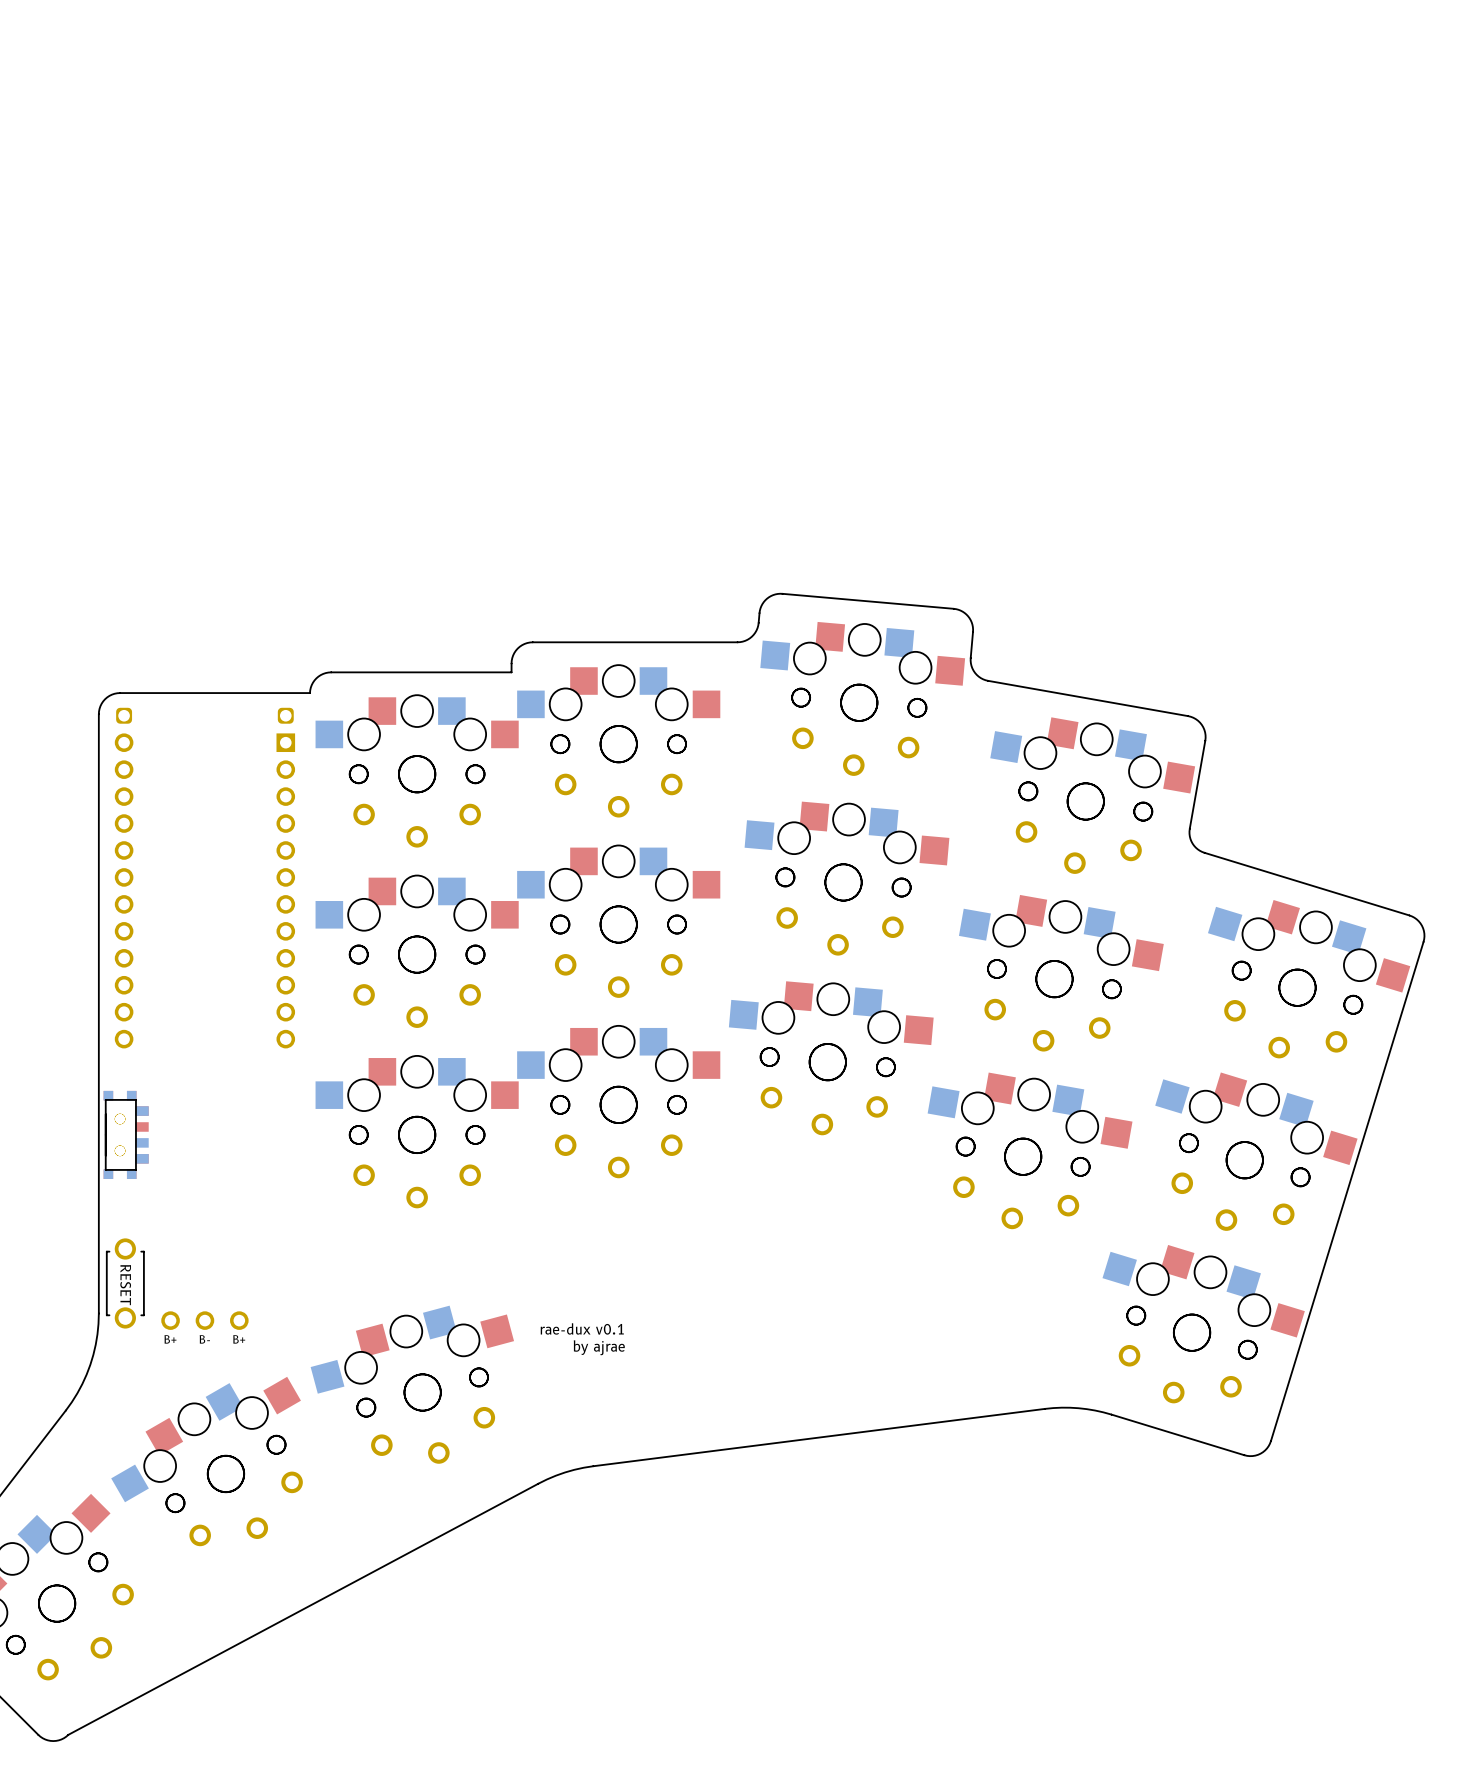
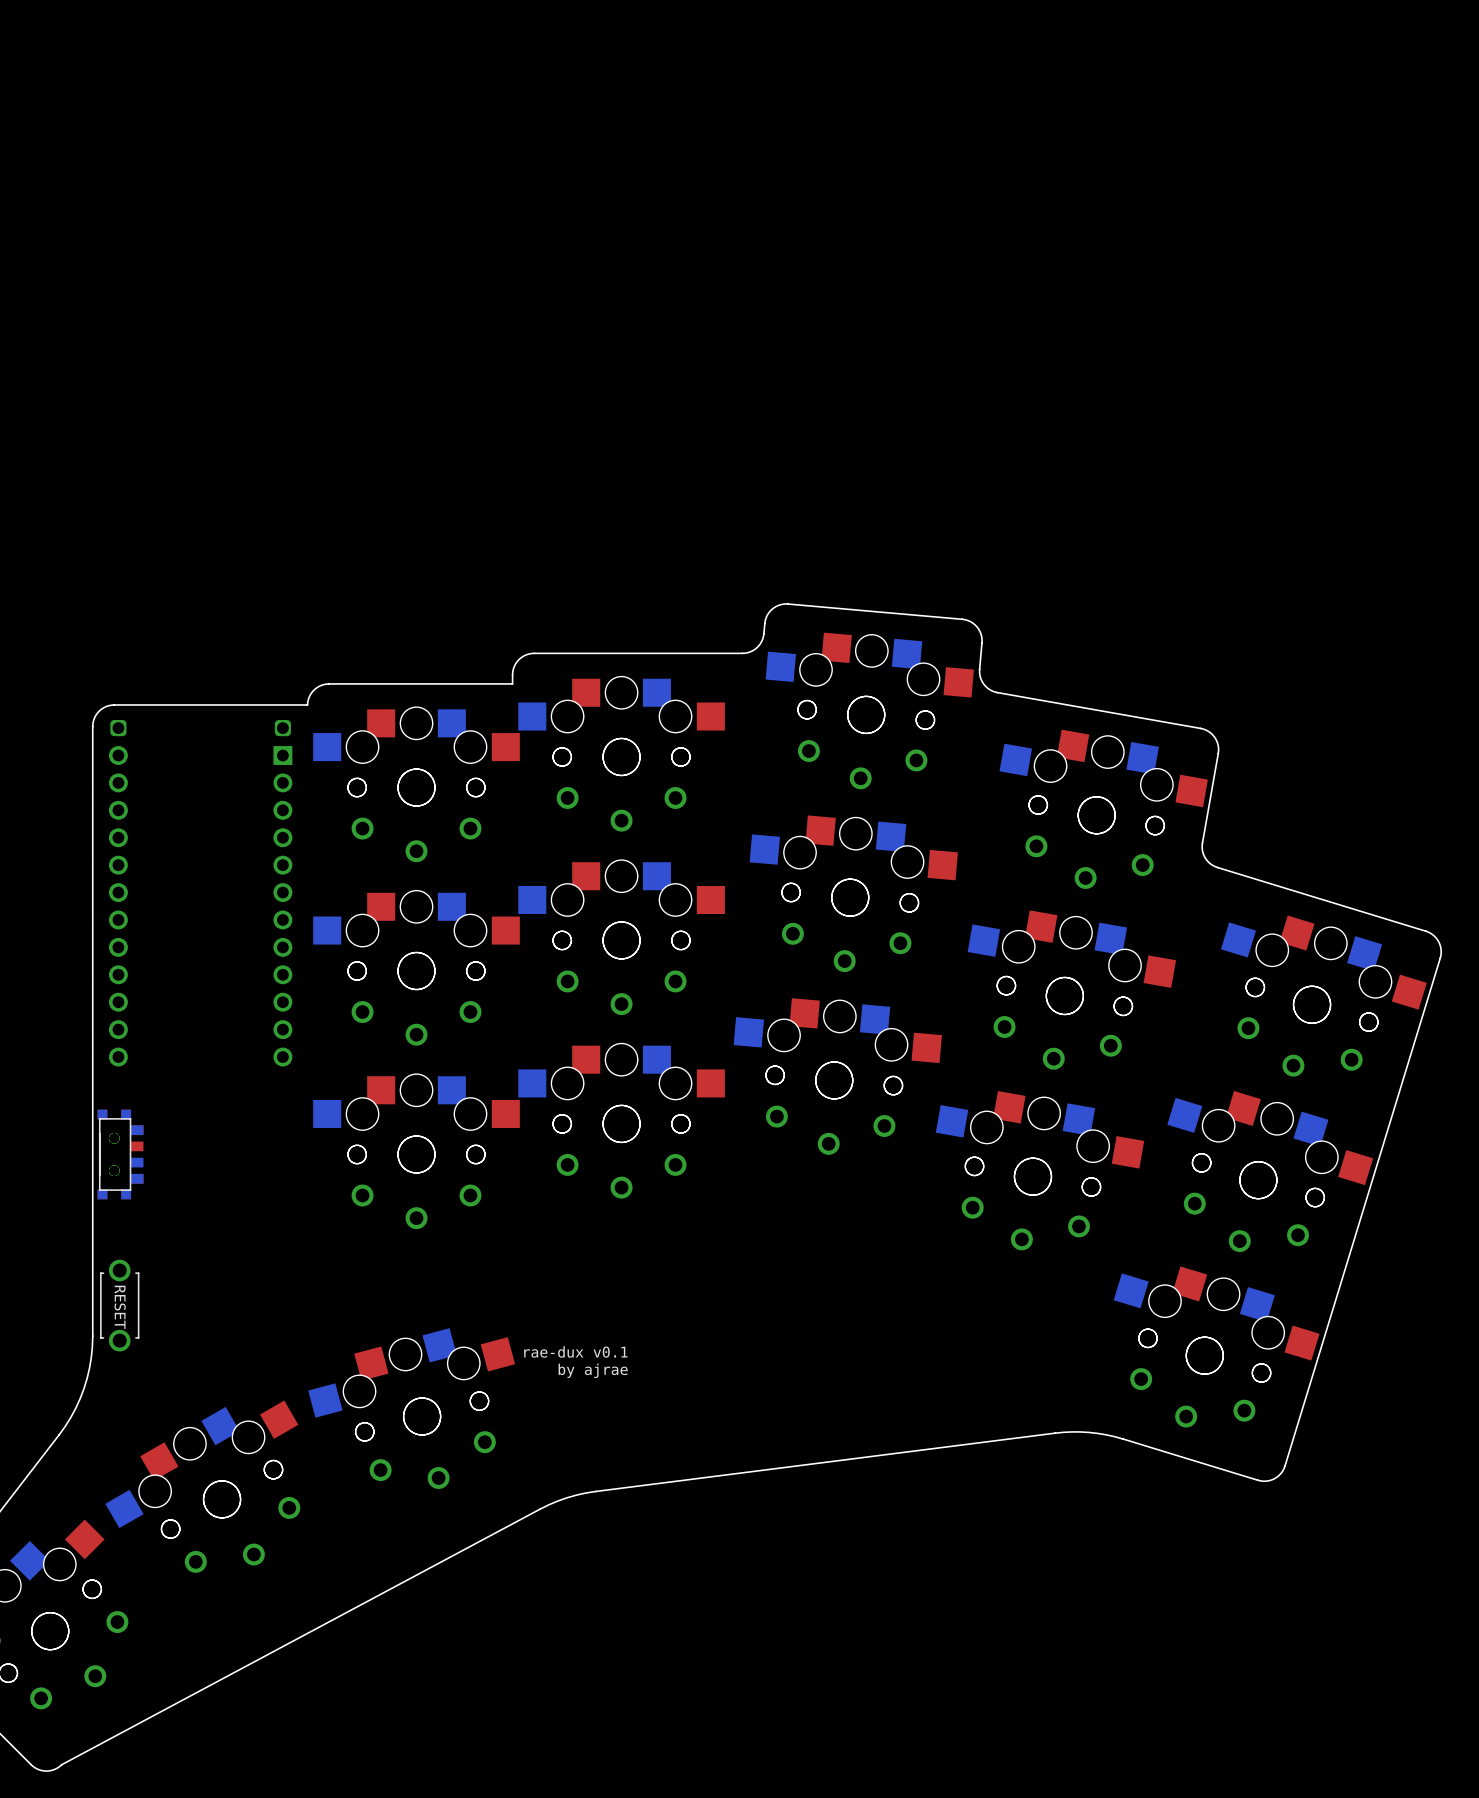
part: (204, 1320) -> none

